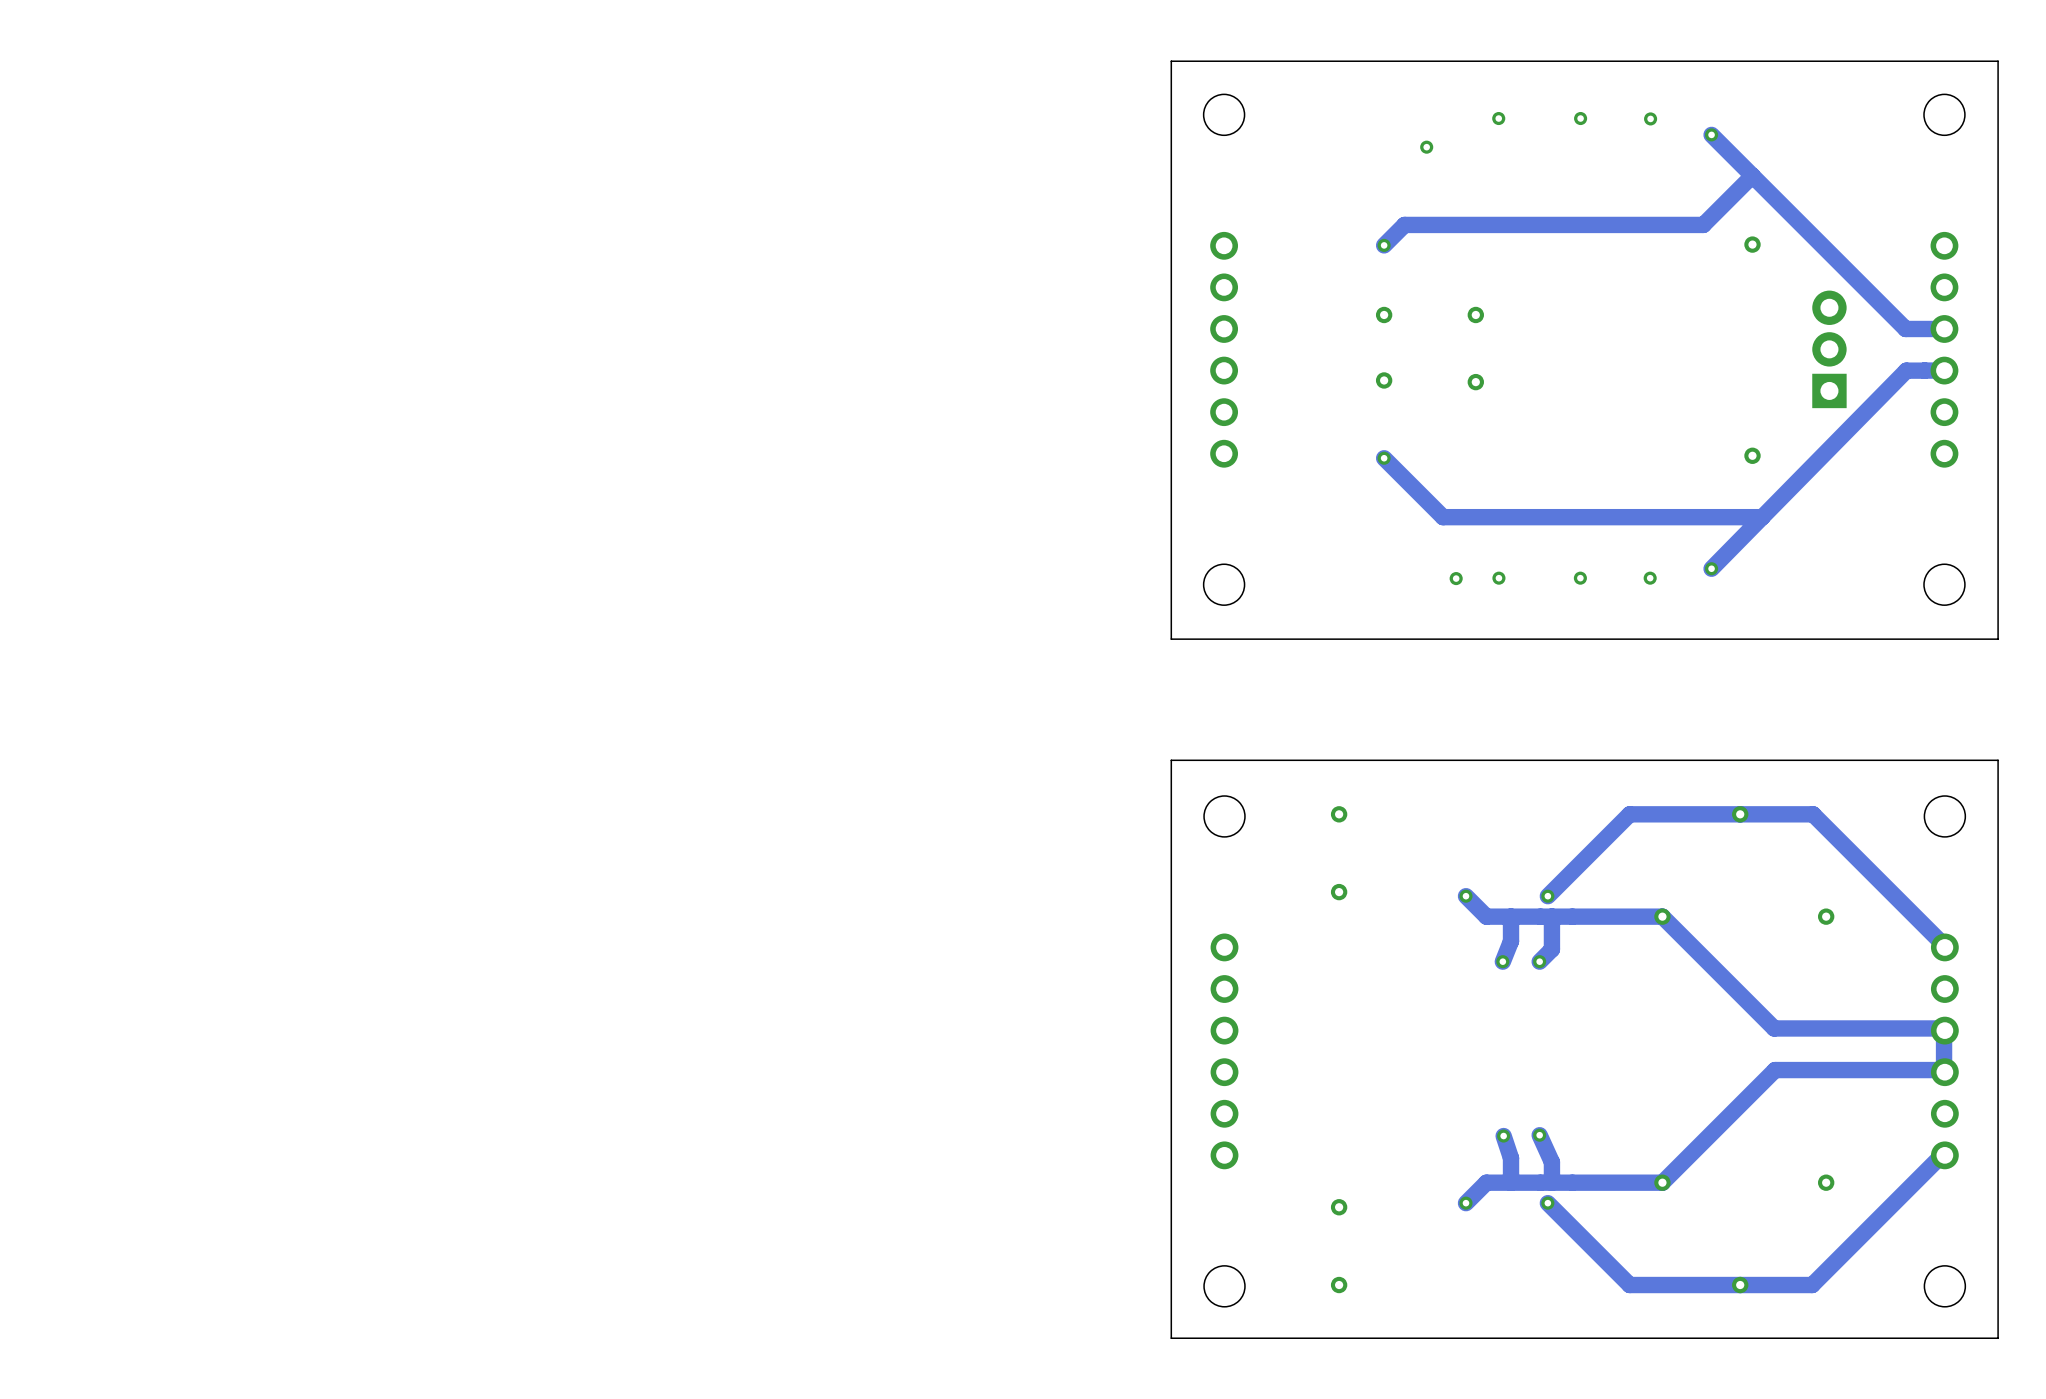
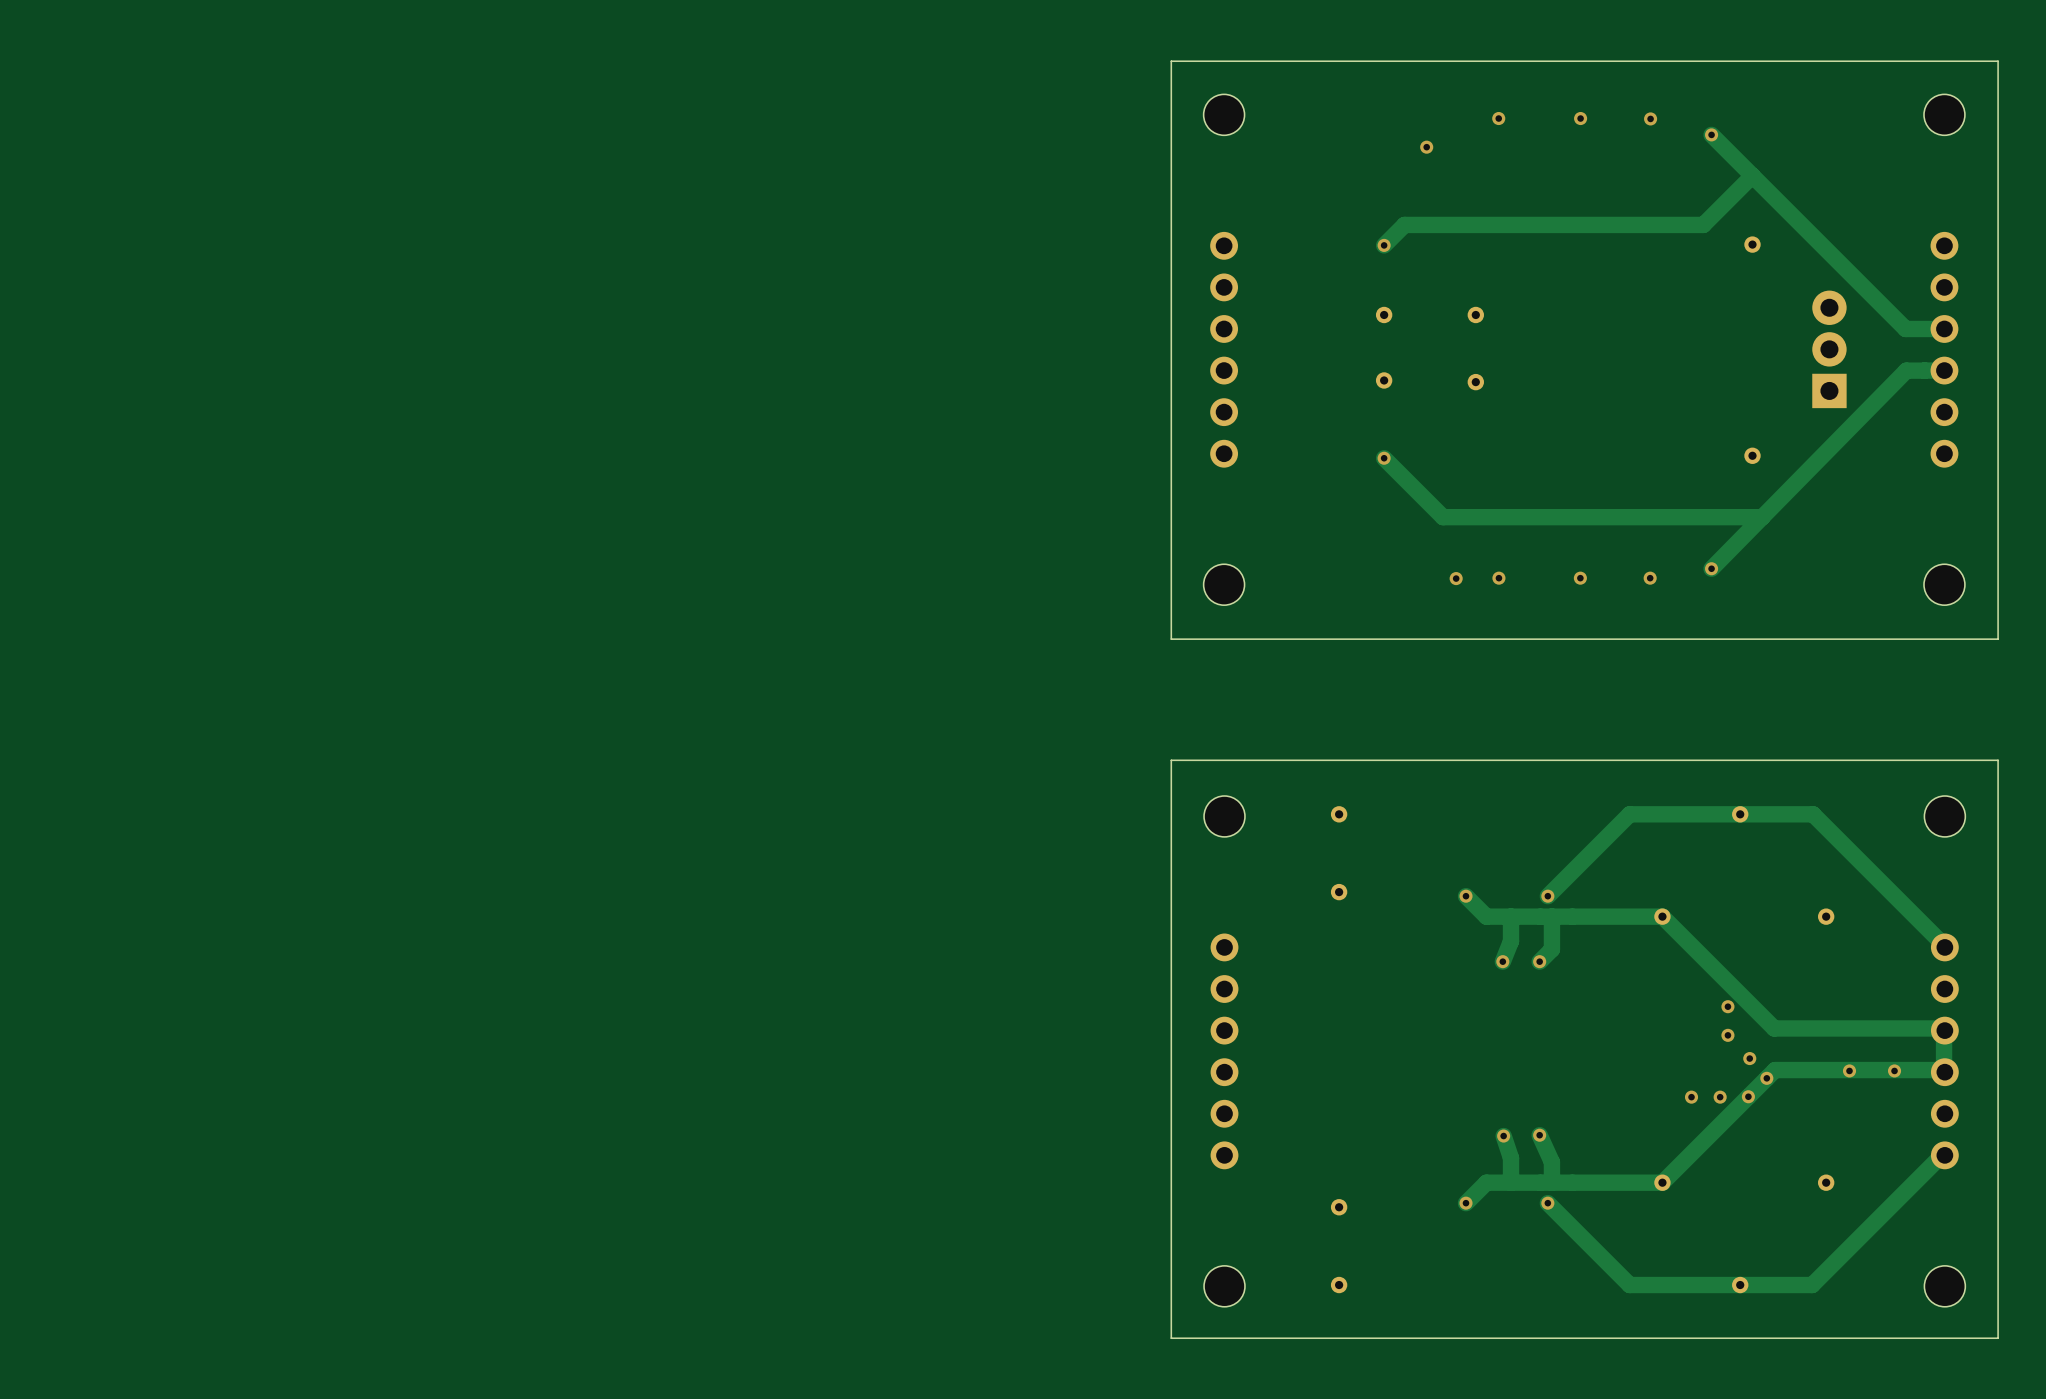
via: none -> (1727, 1006)
via: none -> (1727, 1035)
via: none -> (1749, 1058)
via: none -> (1849, 1070)
via: none -> (1894, 1070)
via: none -> (1766, 1078)
via: none -> (1748, 1096)
via: none -> (1691, 1097)
via: none -> (1720, 1097)

